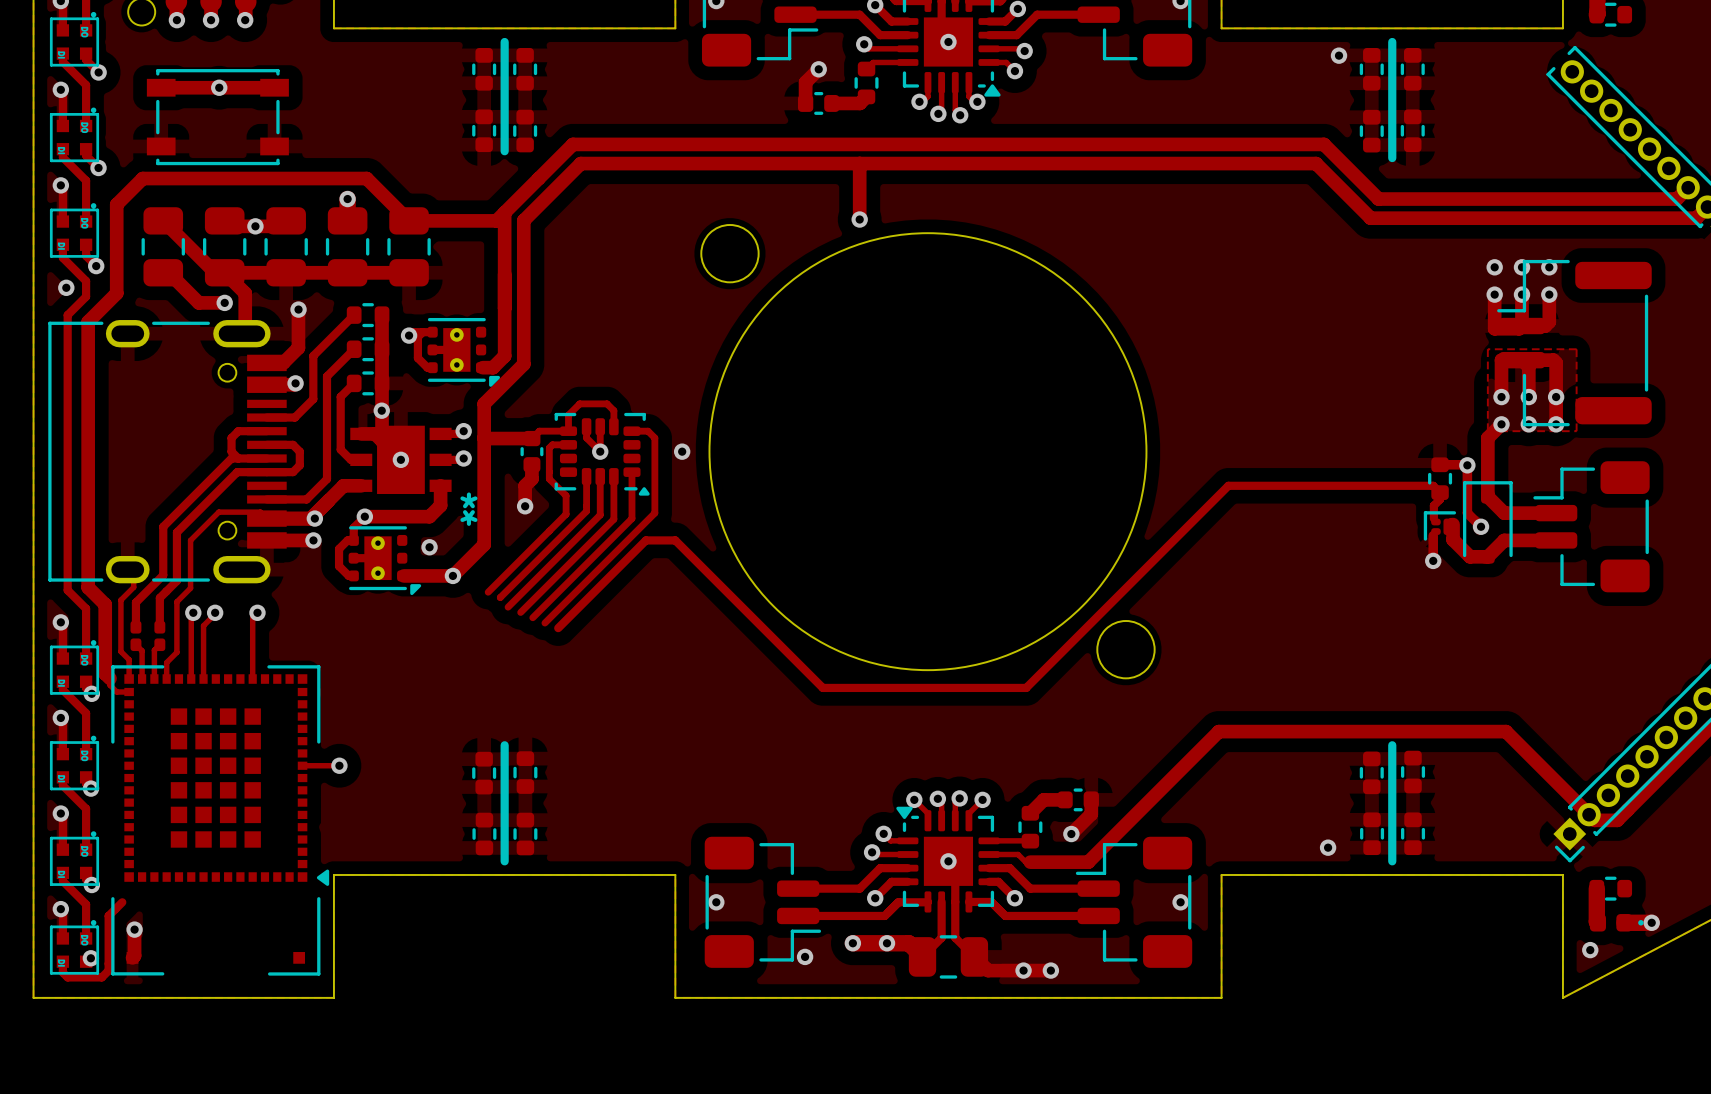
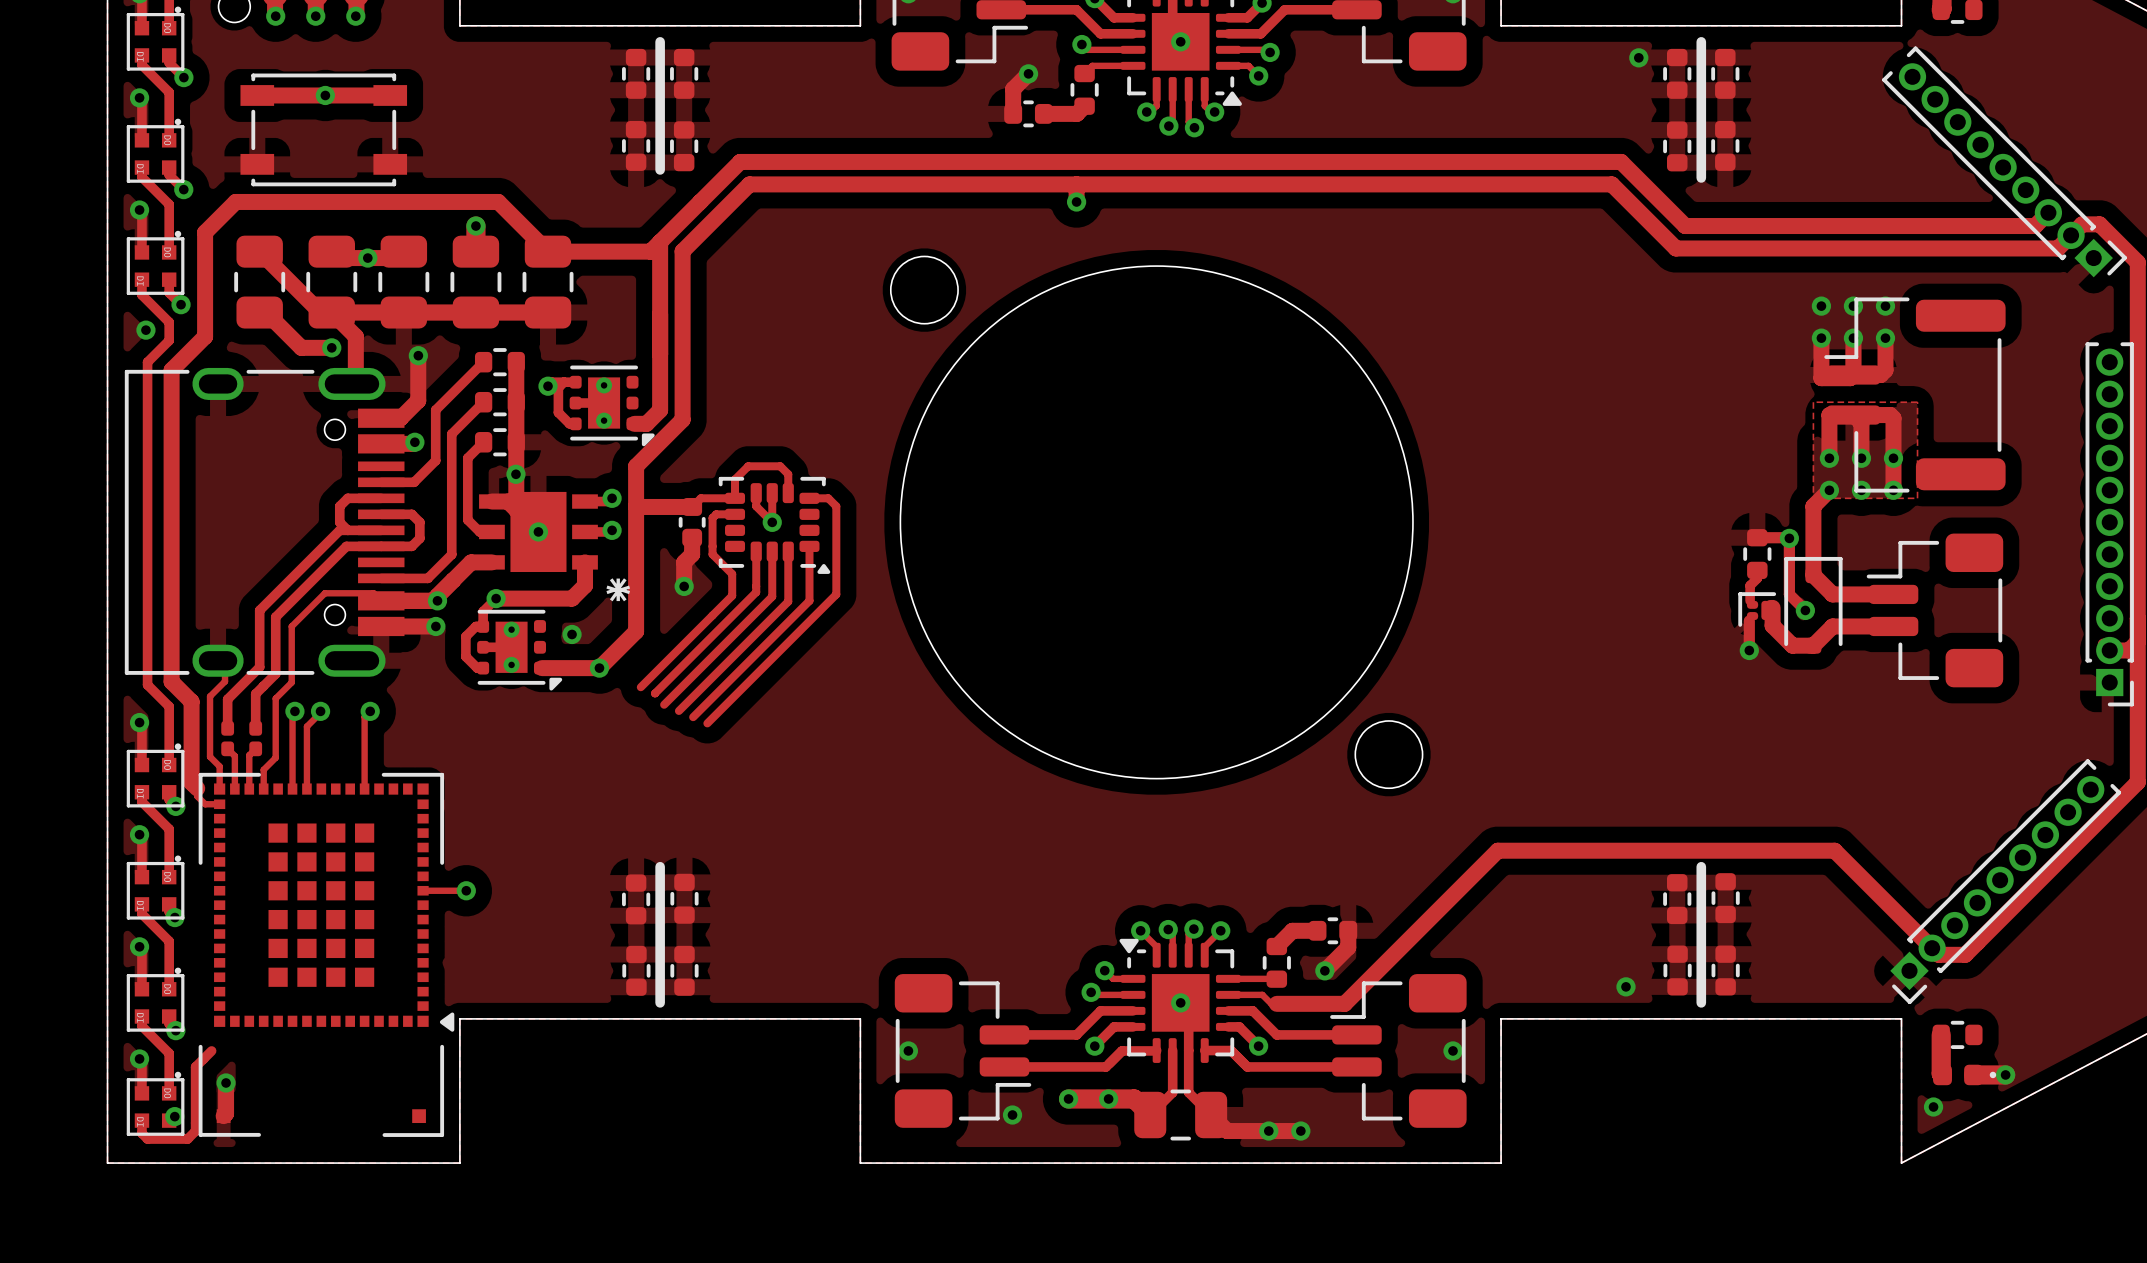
track: (859, 178) (859, 219) -> none
via position: (859, 219) -> (1076, 202)
via: (682, 451) -> none
track: (1440, 492) (1433, 485) (1228, 485) (1026, 687) (822, 687) (675, 540) (645, 540) (558, 628) -> none

